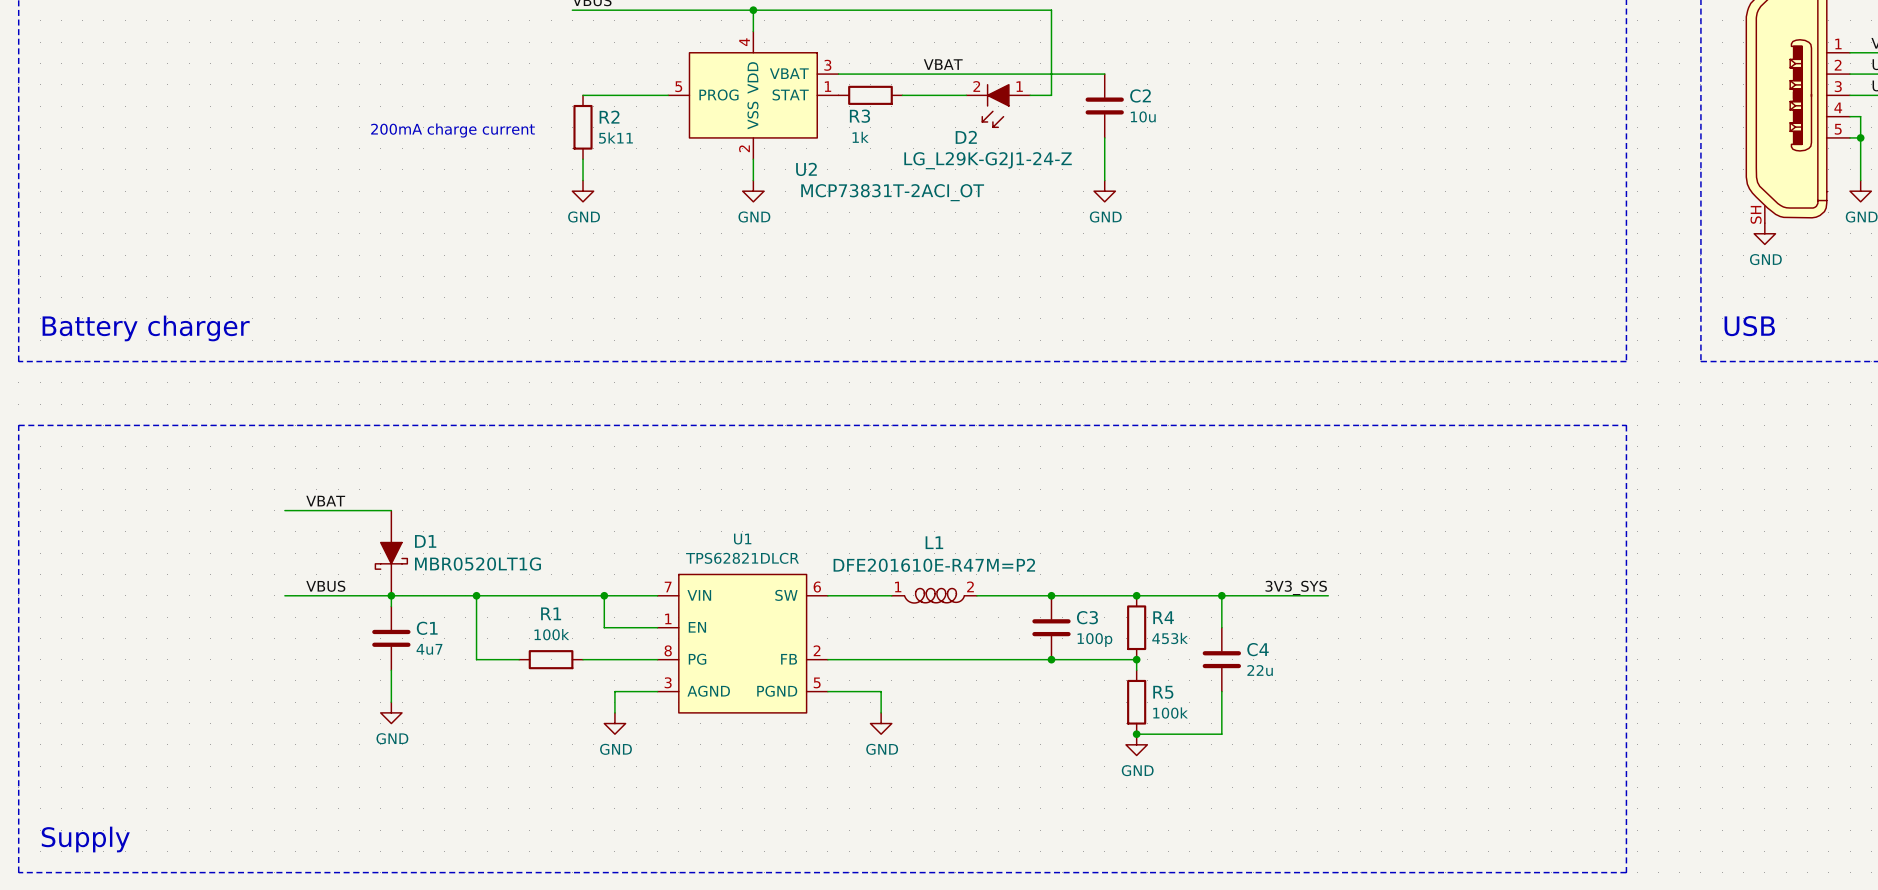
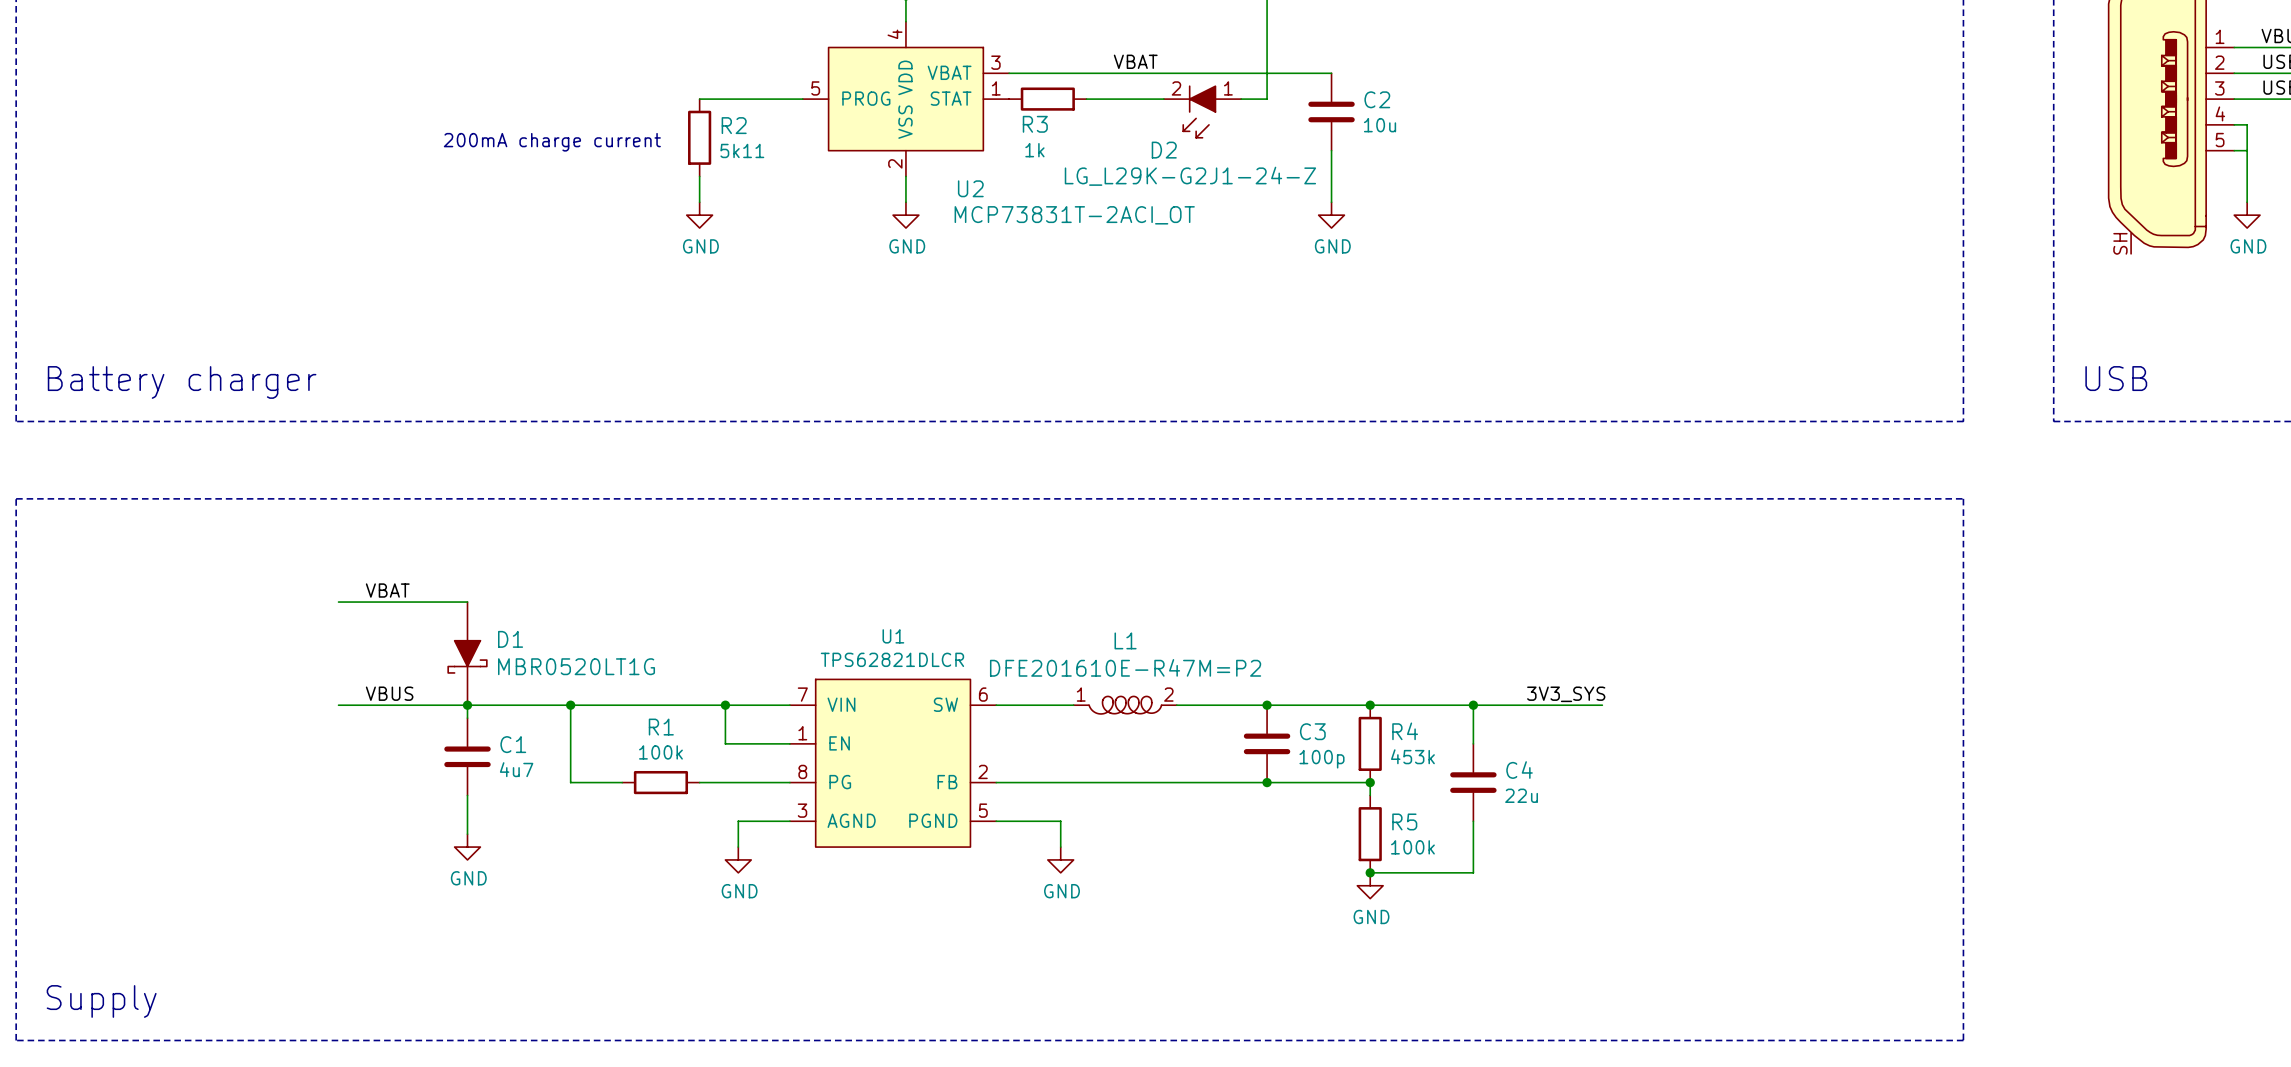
junction: (1860, 137) -> none
power symbol: GND (1764, 233) -> none

